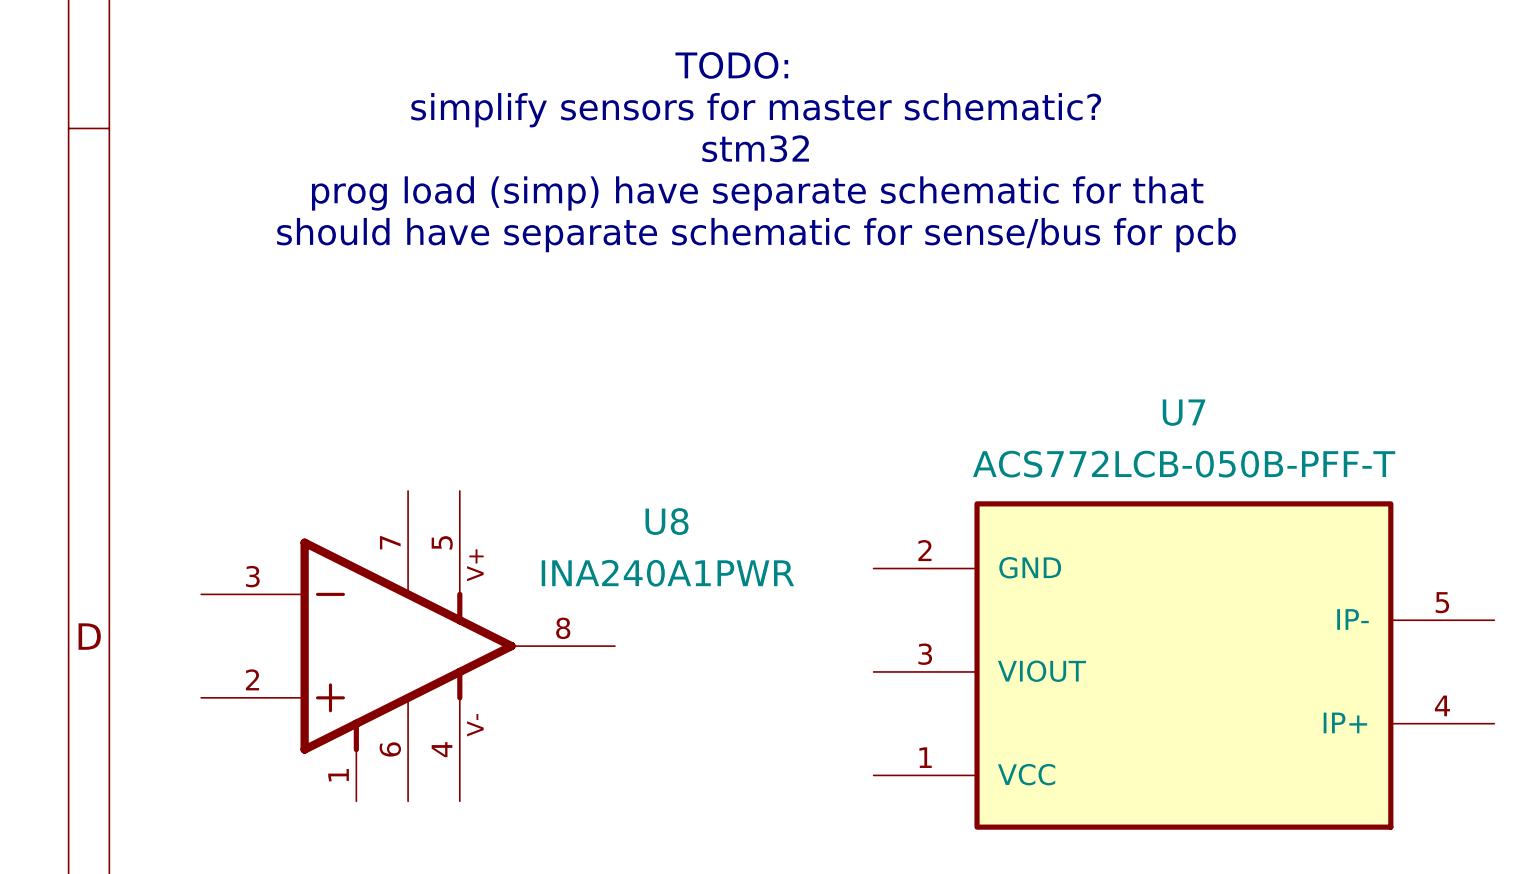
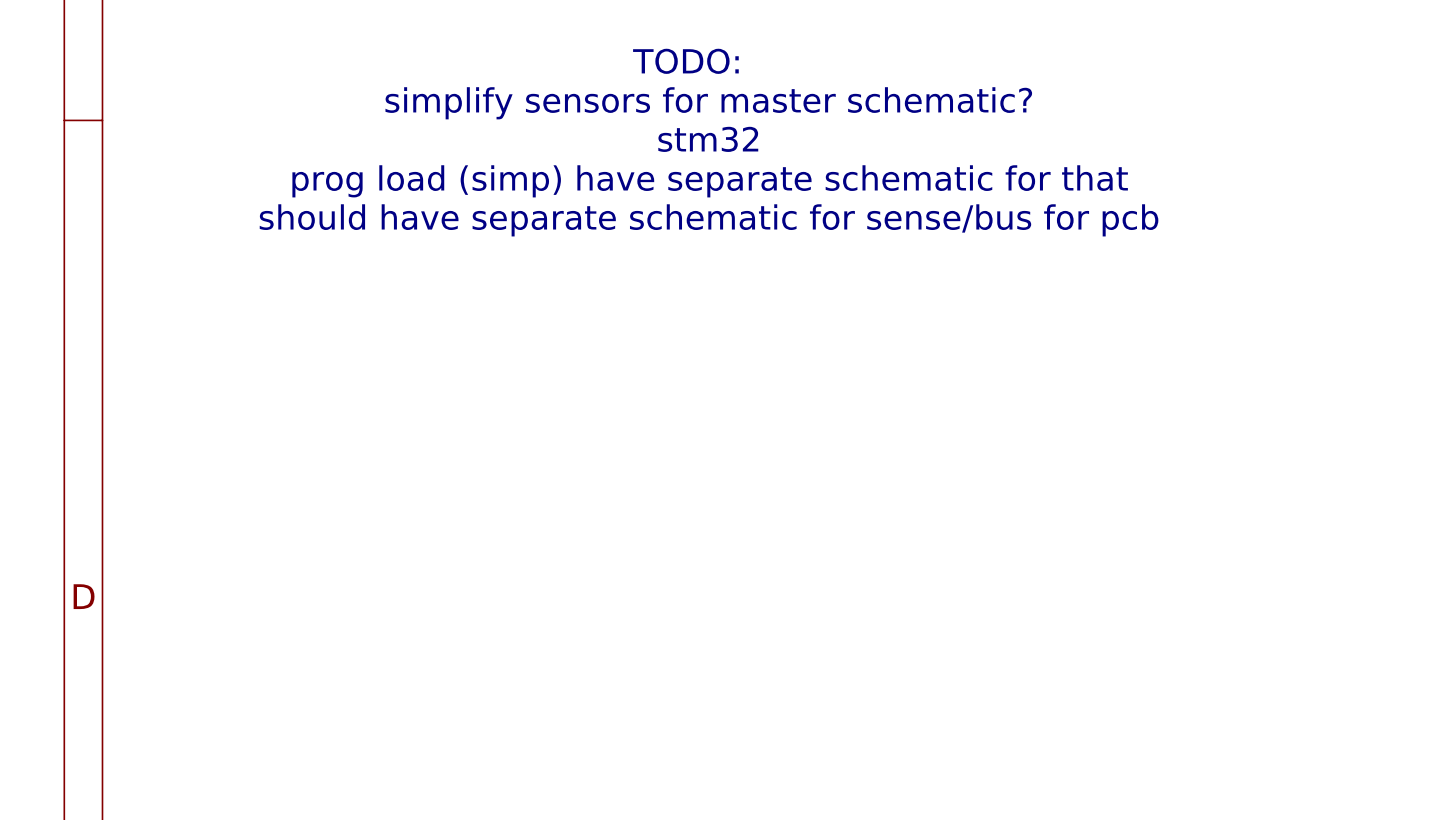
U8: INA240A1PWR (408, 646) -> none
U7: ACS772LCB-050B-PFF-T (1183, 665) -> none

